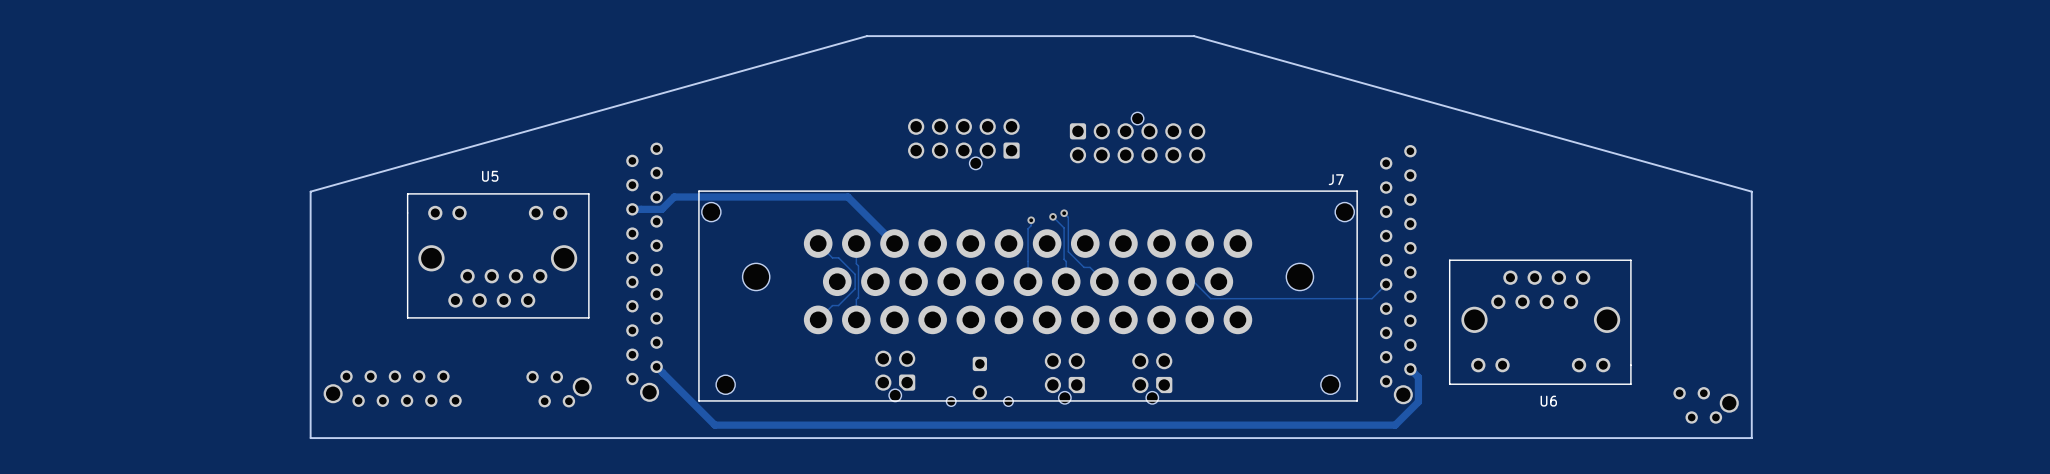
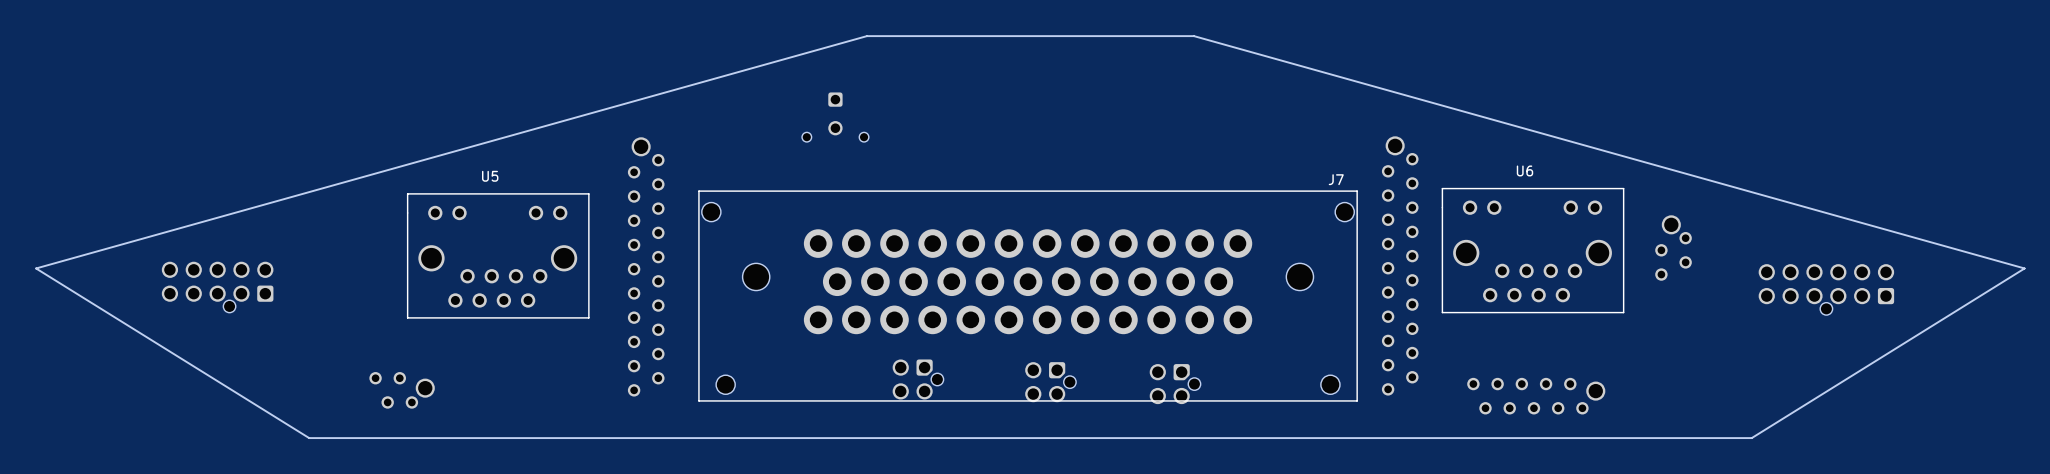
board edge: (866, 36) (310, 191) (310, 438) -> (866, 36) (36, 268) (310, 438)
board edge: (1194, 36) (1751, 191) (1751, 438) -> (1194, 36) (2024, 268) (1751, 438)
part: none -> (835, 117)
part: (1137, 137) -> none
part: (963, 144) -> none
track: (632, 209) (661, 209) (674, 197) (847, 197) (894, 243) -> none
track: (1064, 213) (1068, 217) (1068, 251) (1084, 267) (1090, 267) (1104, 281) -> none
via: (1064, 213) -> none
track: (1053, 216) (1064, 227) (1066, 281) -> none
via: (1053, 216) -> none
track: (1031, 220) (1031, 225) (1028, 228) (1028, 281) -> none
via: (1031, 220) -> none
track: (818, 243) (832, 257) (838, 257) (855, 274) (855, 288) (838, 305) (832, 305) (818, 319) -> none
track: (856, 243) (856, 263) (858, 265) (856, 319) -> none
part rotation: 0° (644, 272) -> 180° (646, 266)
part rotation: 0° (1398, 274) -> 180° (1400, 265)
track: (1180, 281) (1193, 281) (1210, 298) (1371, 298) (1386, 284) -> none
part: none -> (217, 287)
part: none -> (1826, 289)
U6 rotation: 0° (1540, 322) -> 180° (1533, 250)
track: (656, 366) (714, 425) (1395, 425) (1418, 401) (1418, 377) (1410, 369) -> none
part rotation: 0° (895, 376) -> 90° counterclockwise (918, 379)
part rotation: 0° (1064, 378) -> 90° counterclockwise (1050, 382)
part rotation: 0° (1152, 378) -> 90° counterclockwise (1175, 384)
part: (979, 381) -> none
part: (392, 388) -> none
part position: (559, 389) -> (402, 390)
part: none -> (1536, 396)
part rotation: 0° (1706, 405) -> 90° counterclockwise (1673, 248)
part position: (1706, 405) -> (1673, 248)

